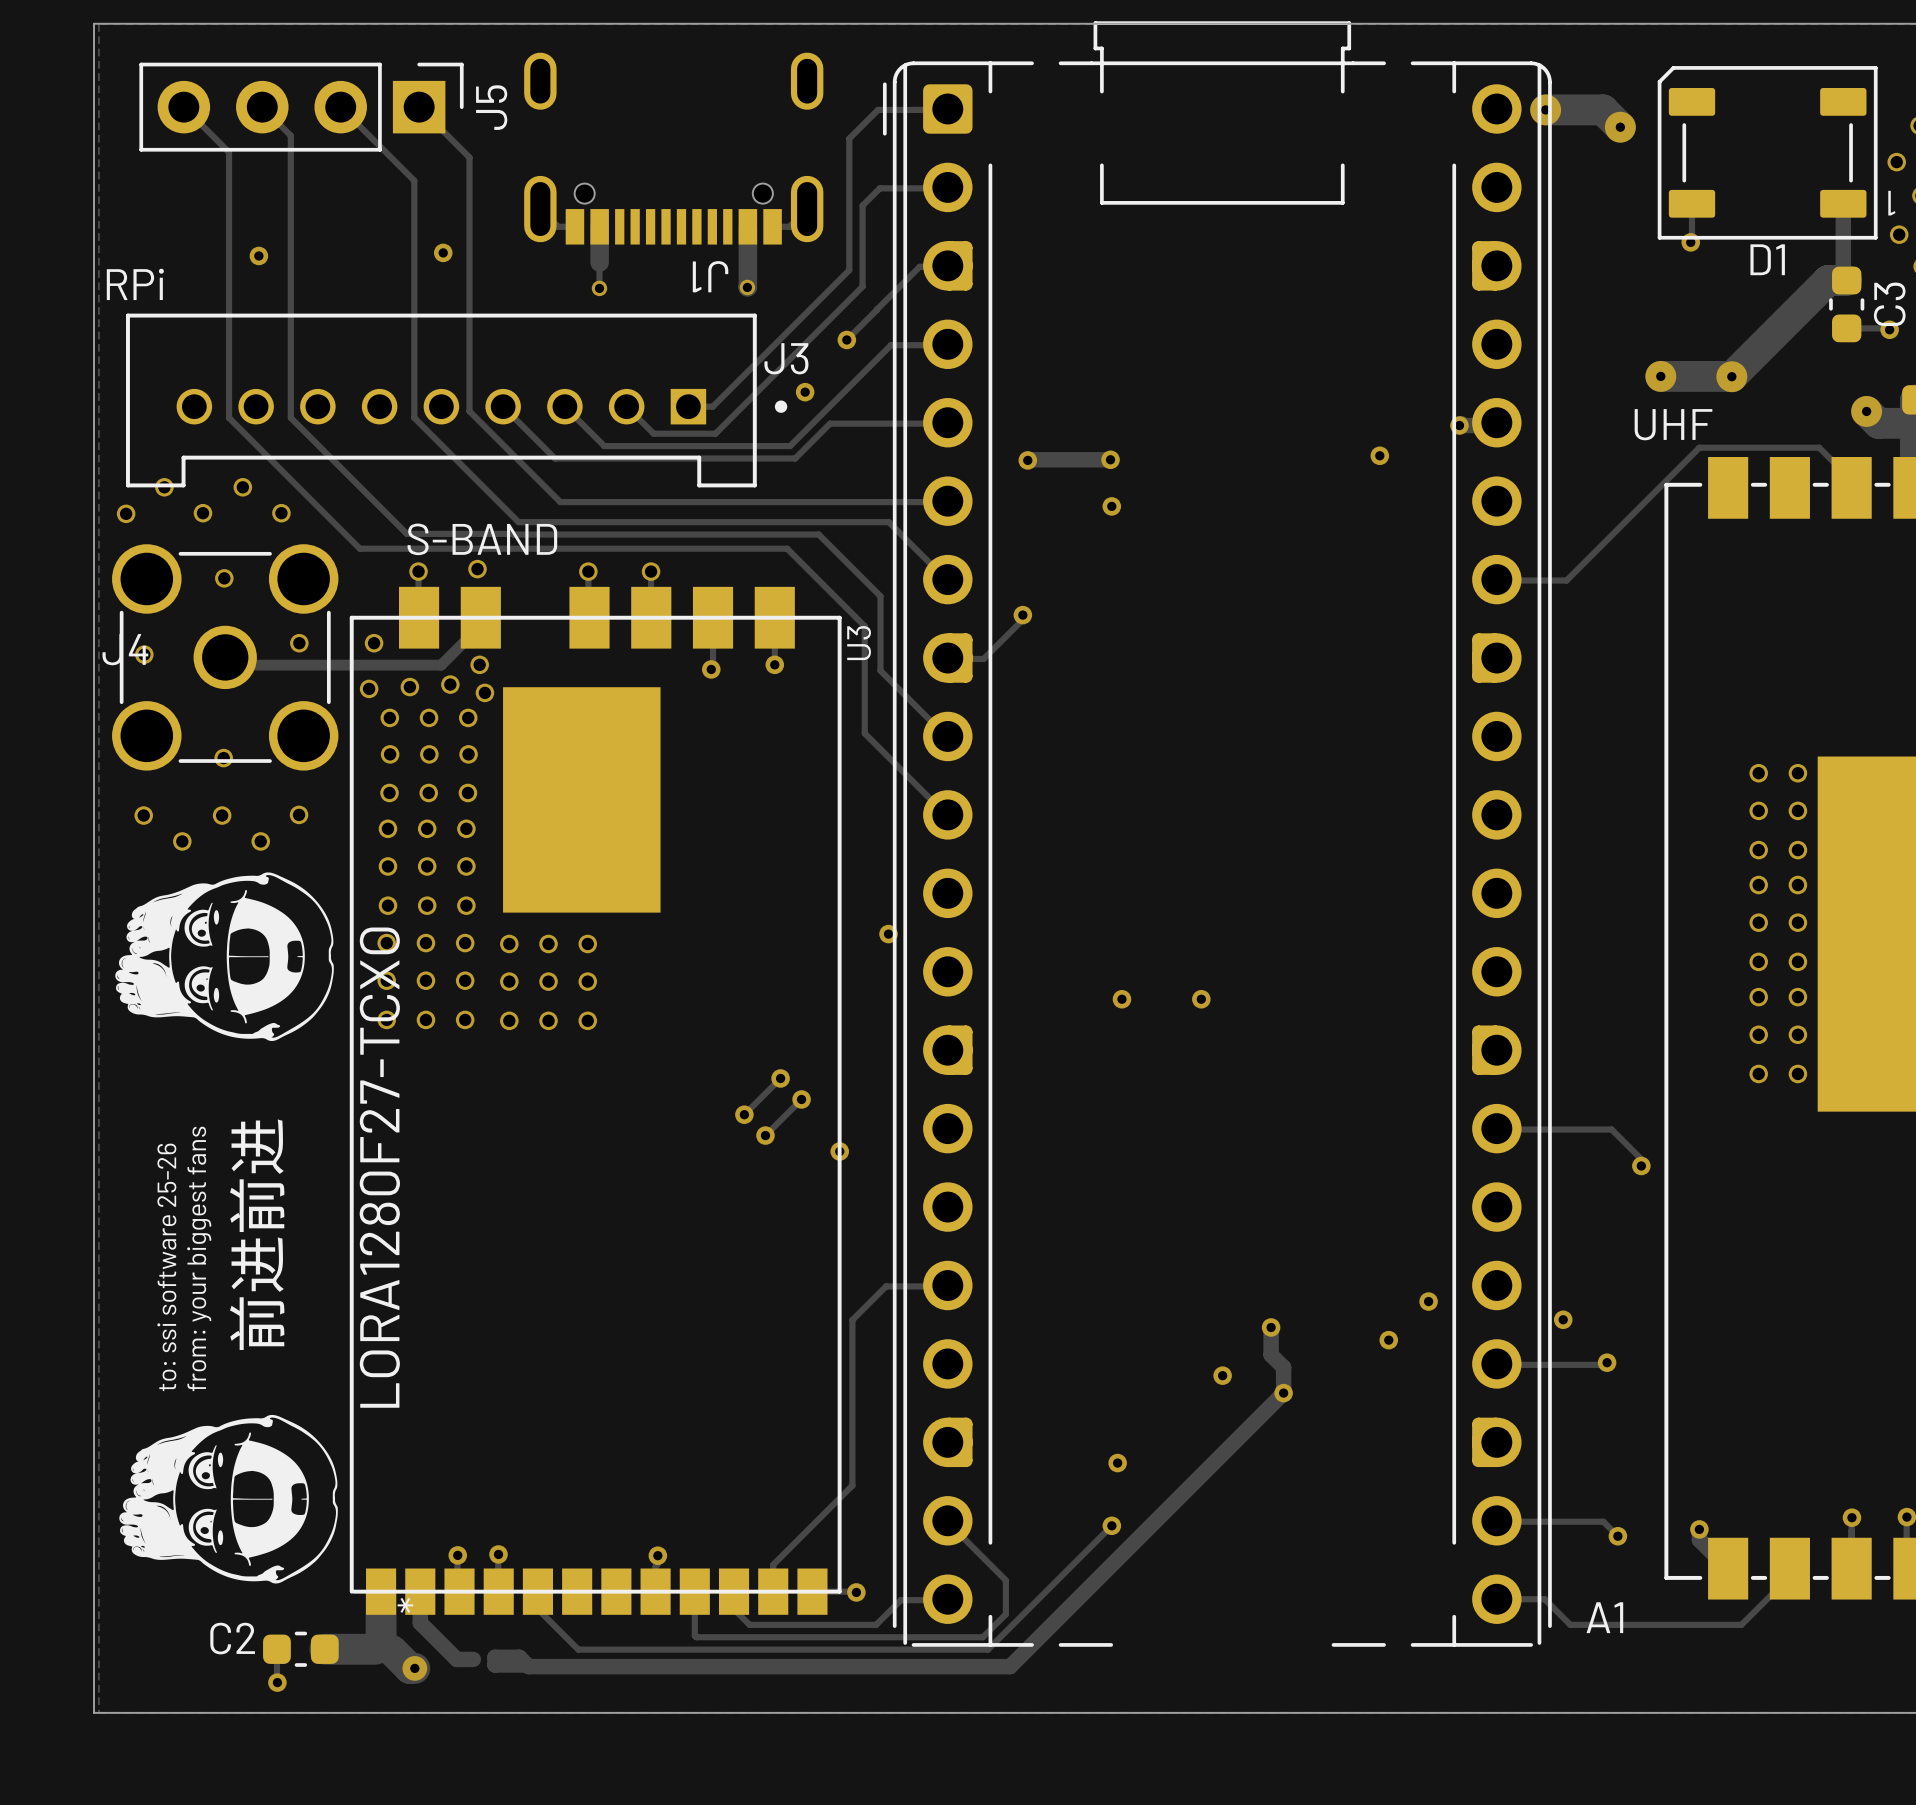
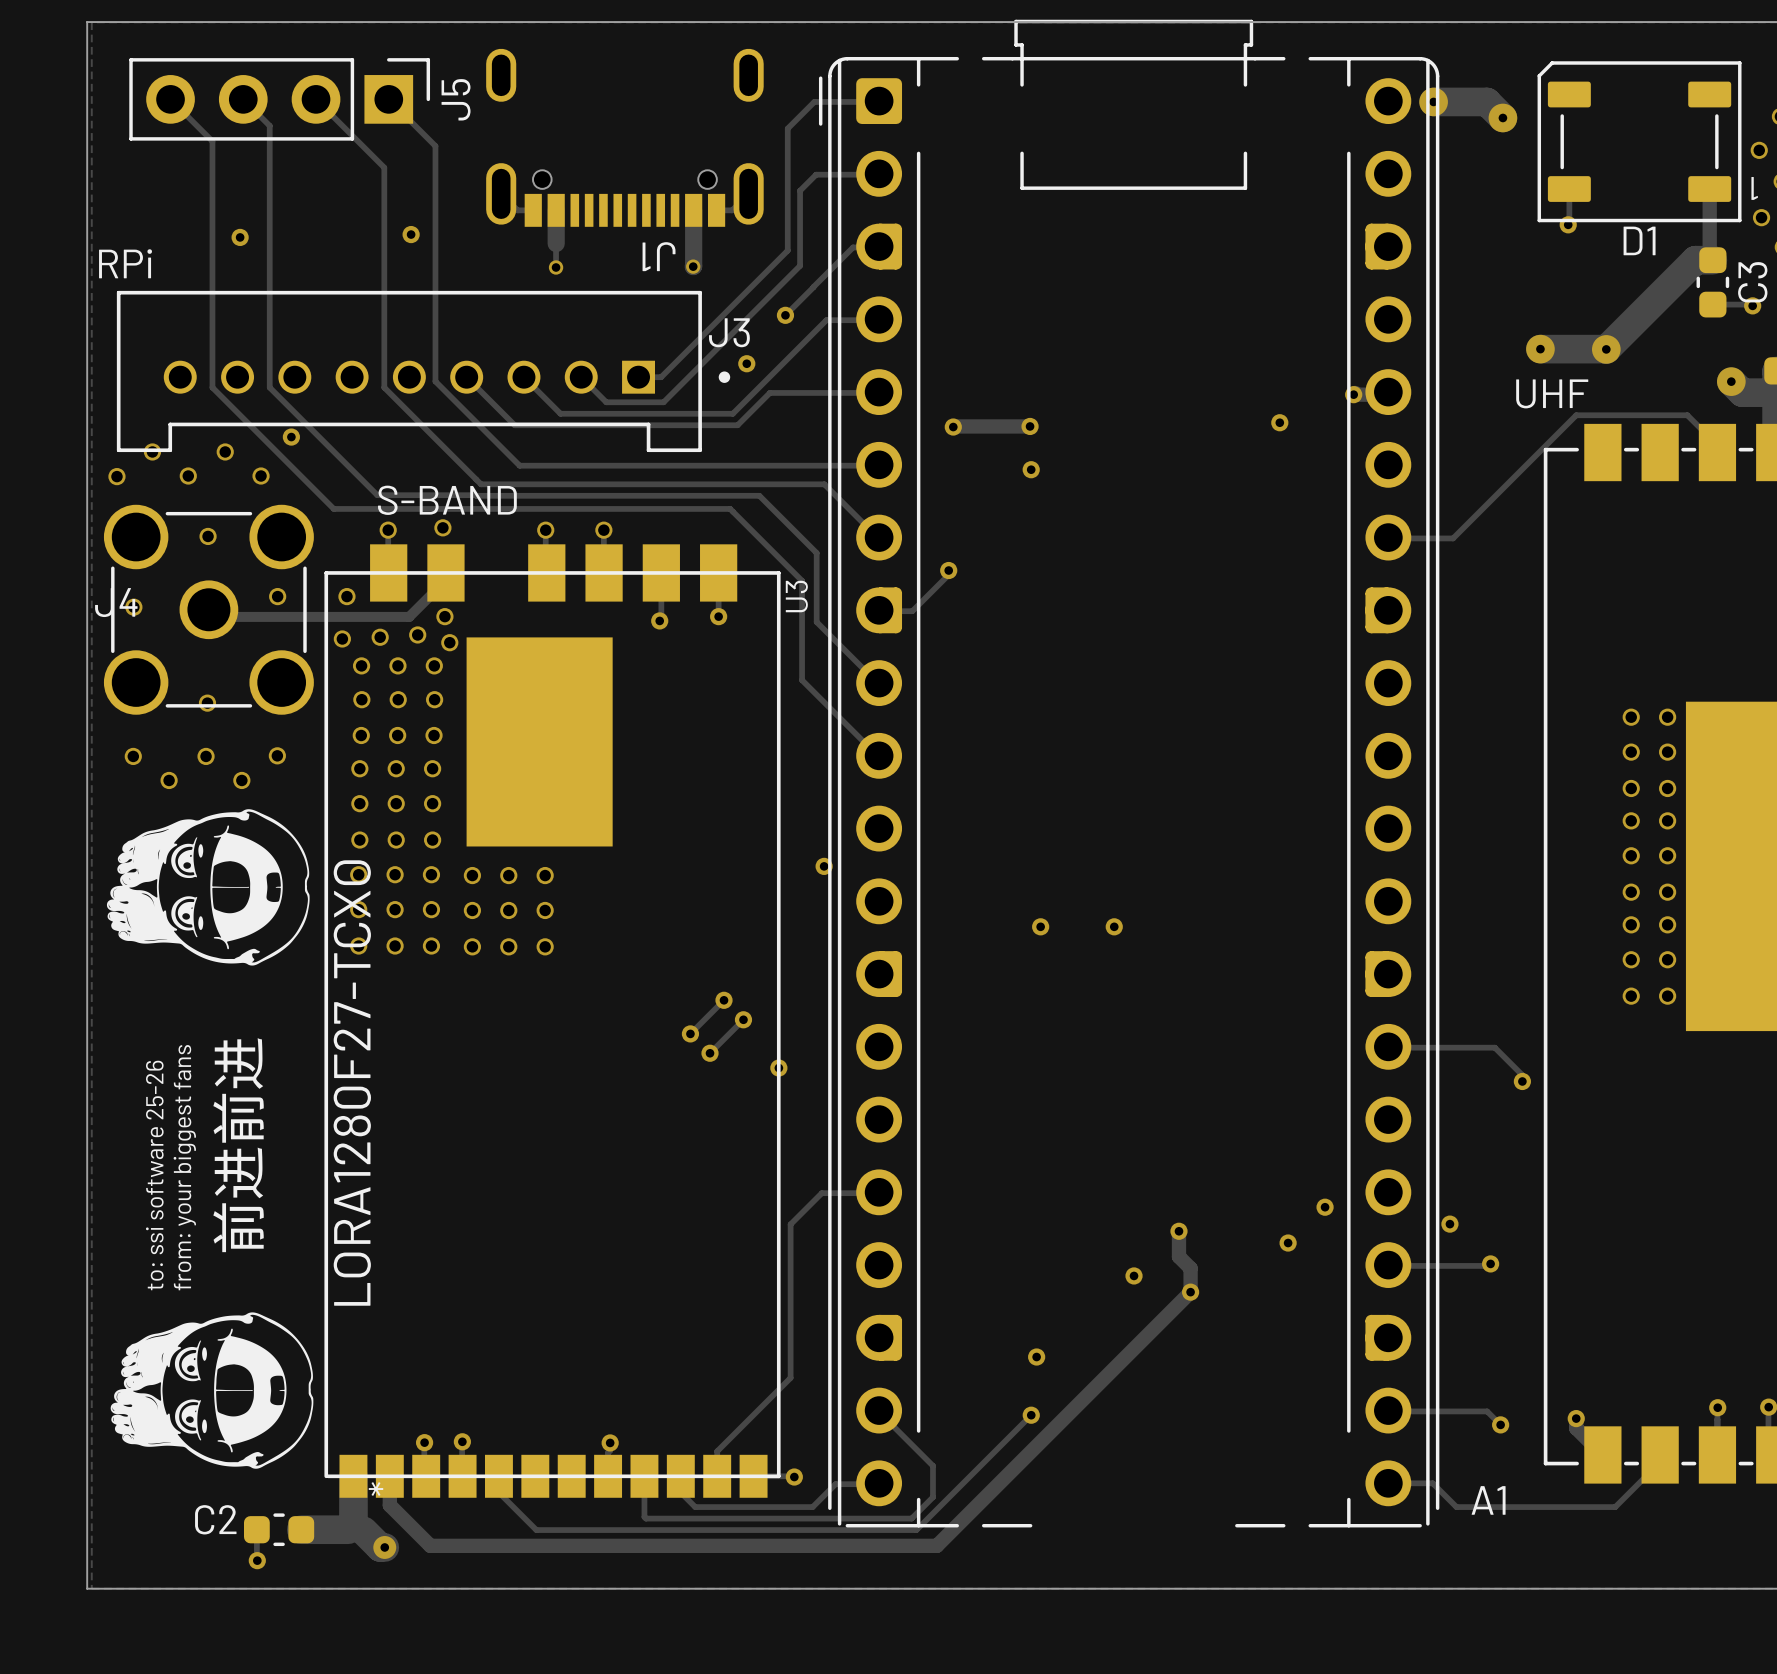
via: none -> (291, 437)
track: (456, 1659) (473, 1659) -> (423, 1539) (430, 1545) (490, 1545)
track: (523, 1665) (495, 1665) (495, 1657) (519, 1657) (528, 1666) -> none

